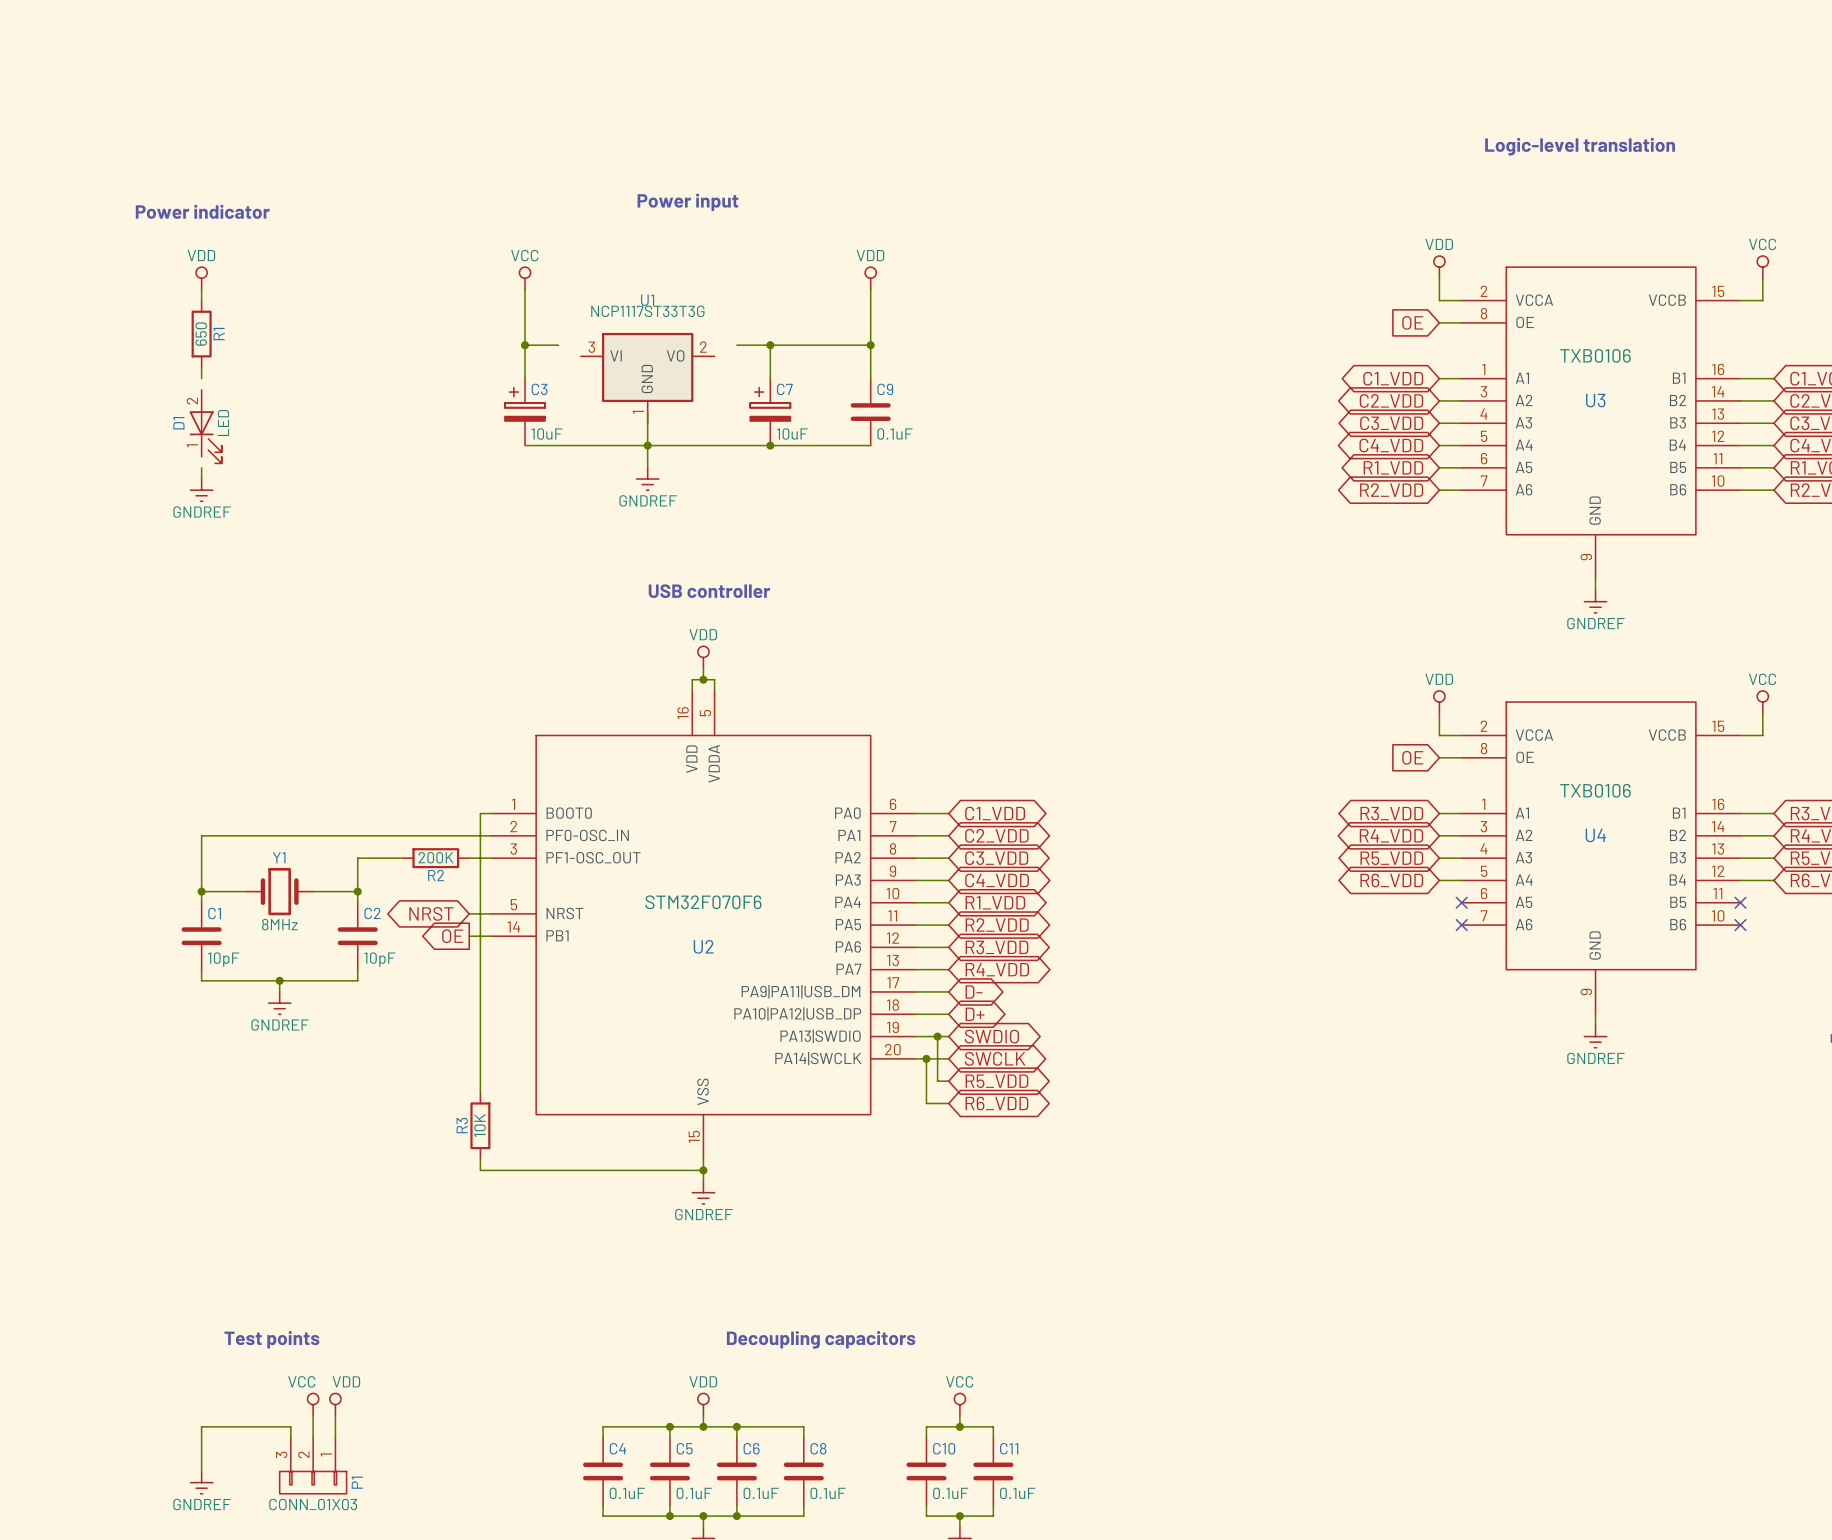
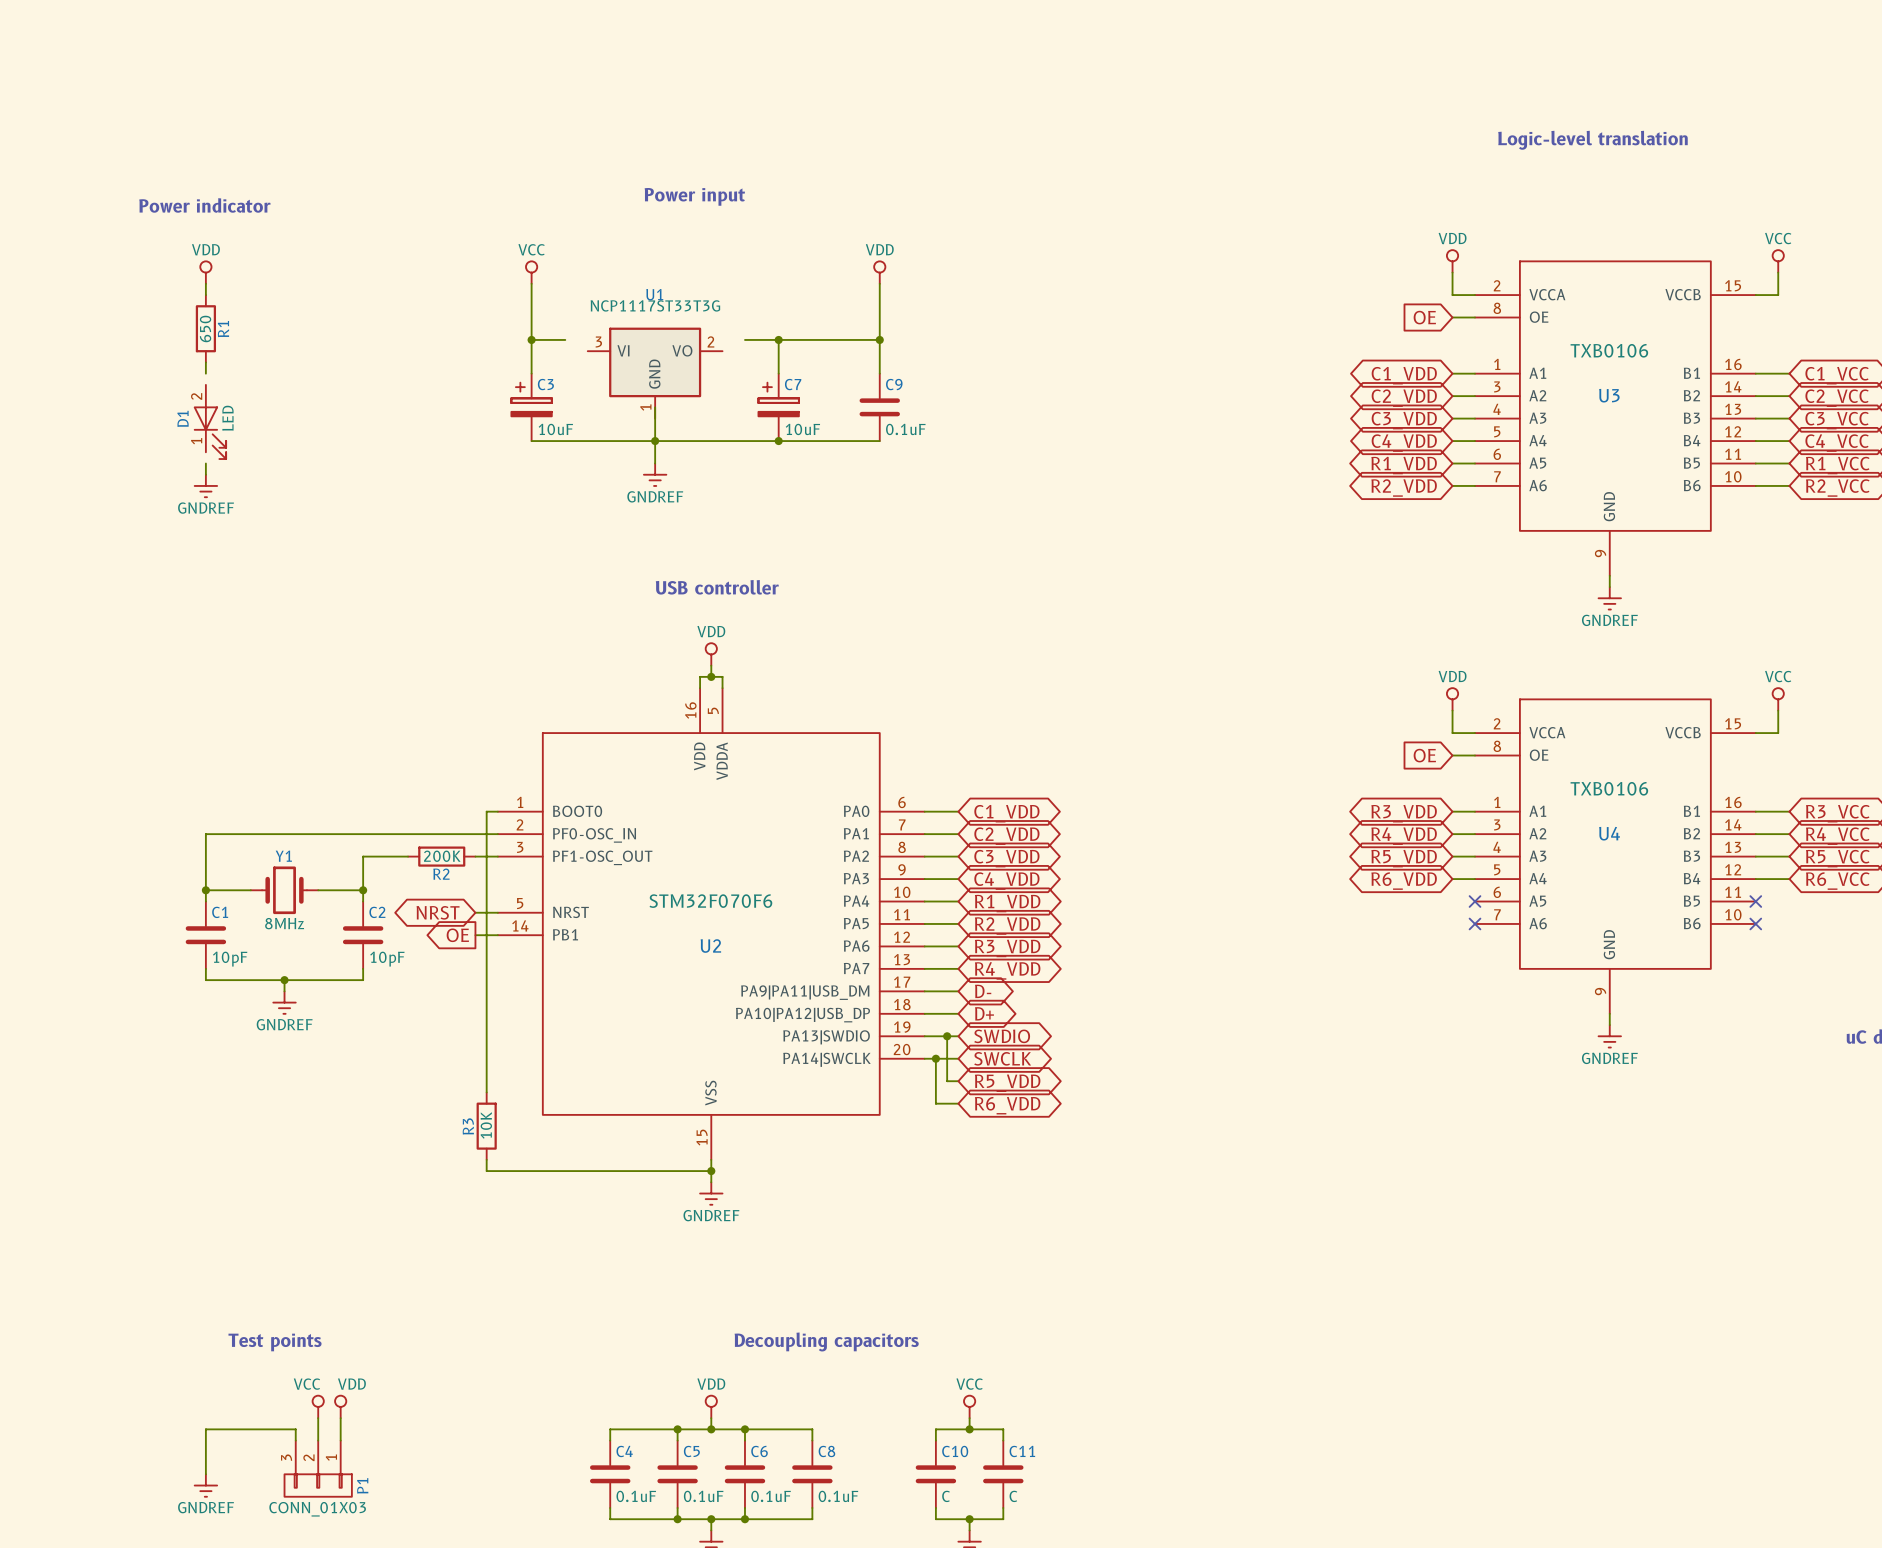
C10 value: 0.1uF (950, 1493) -> C (946, 1496)
C11 value: 0.1uF (1017, 1493) -> C (1013, 1496)

